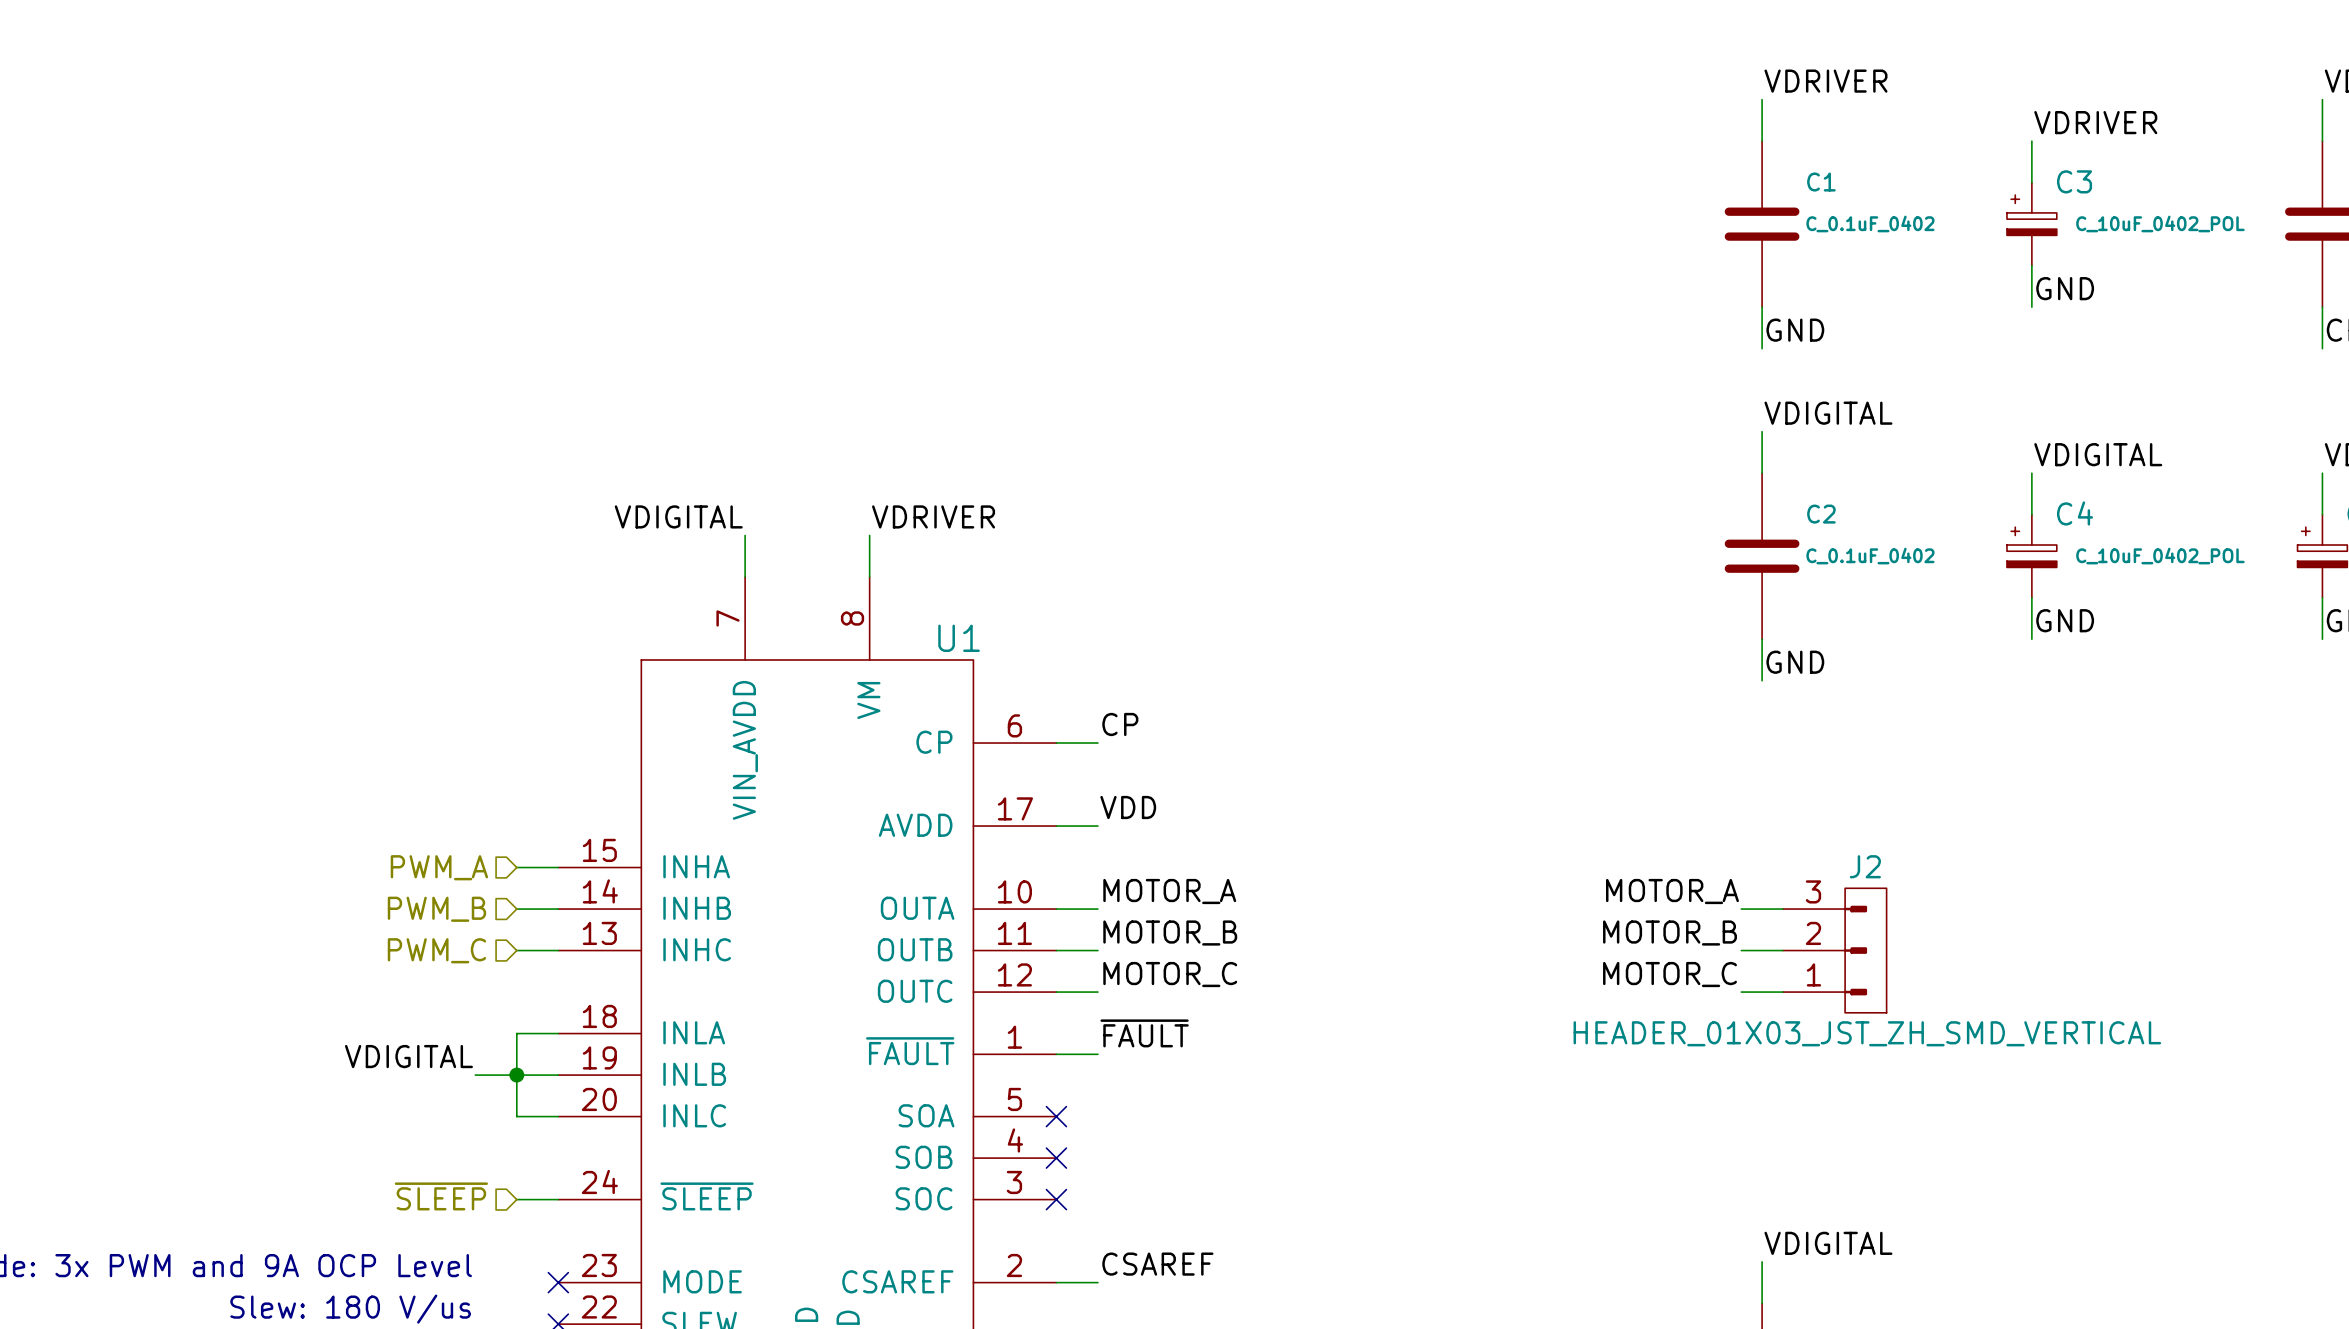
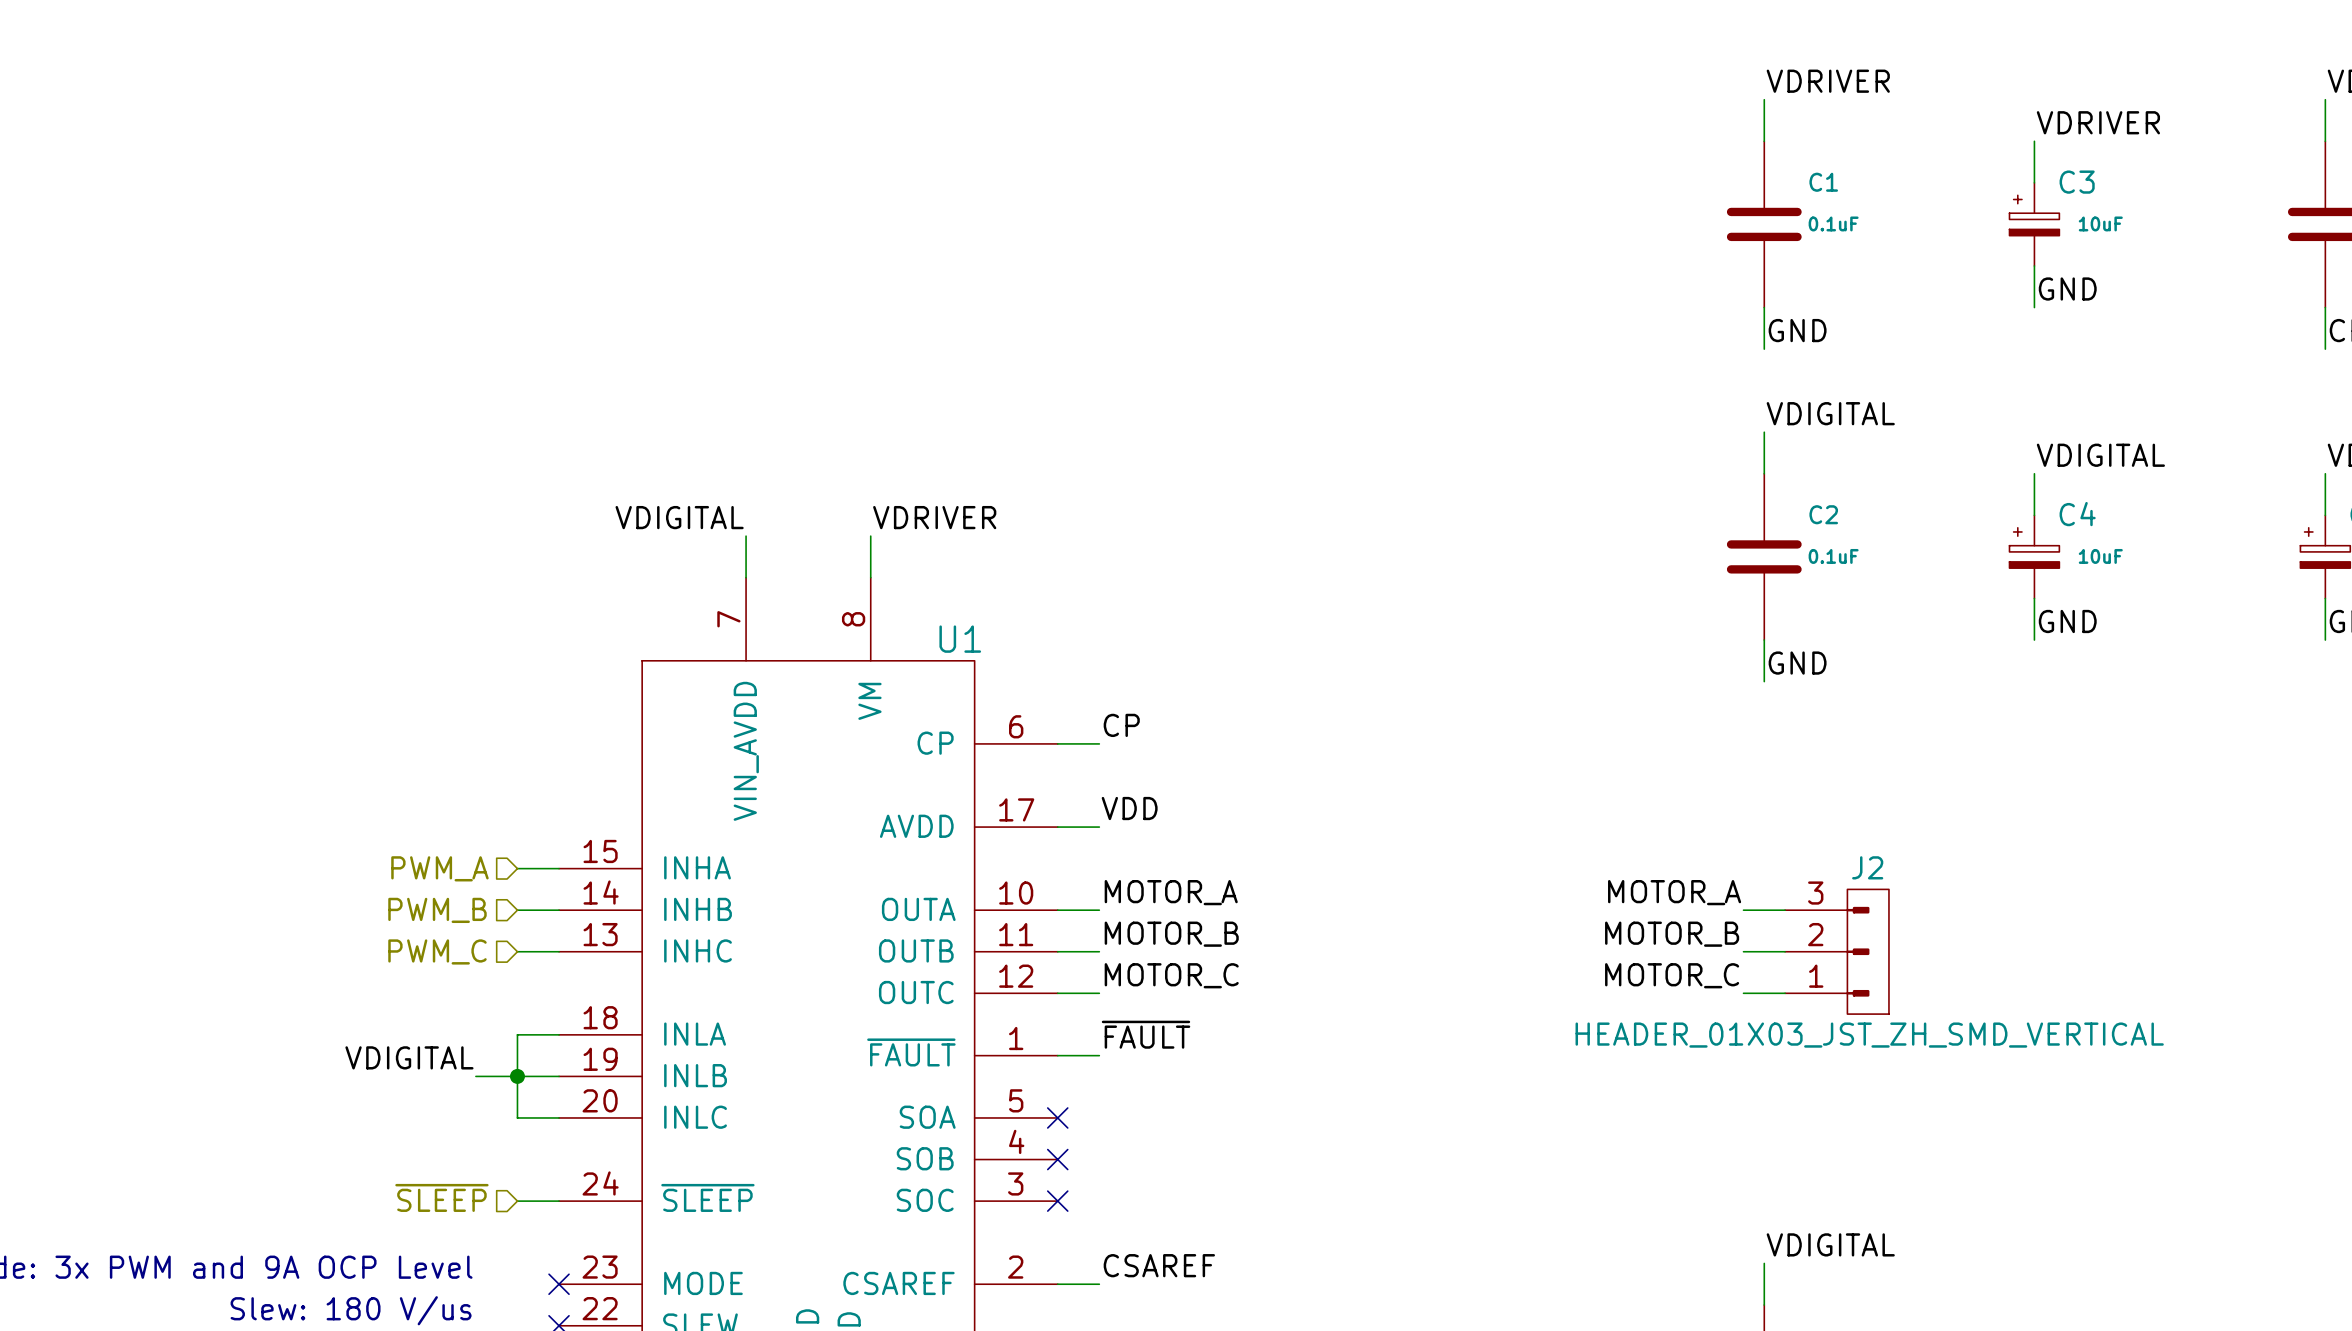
C1 value: C_0.1uF_0402 (1870, 223) -> 0.1uF (1833, 223)
C3 value: C_10uF_0402_POL (2160, 223) -> 10uF (2100, 223)
C2 value: C_0.1uF_0402 (1870, 556) -> 0.1uF (1833, 556)
C4 value: C_10uF_0402_POL (2160, 556) -> 10uF (2100, 556)

